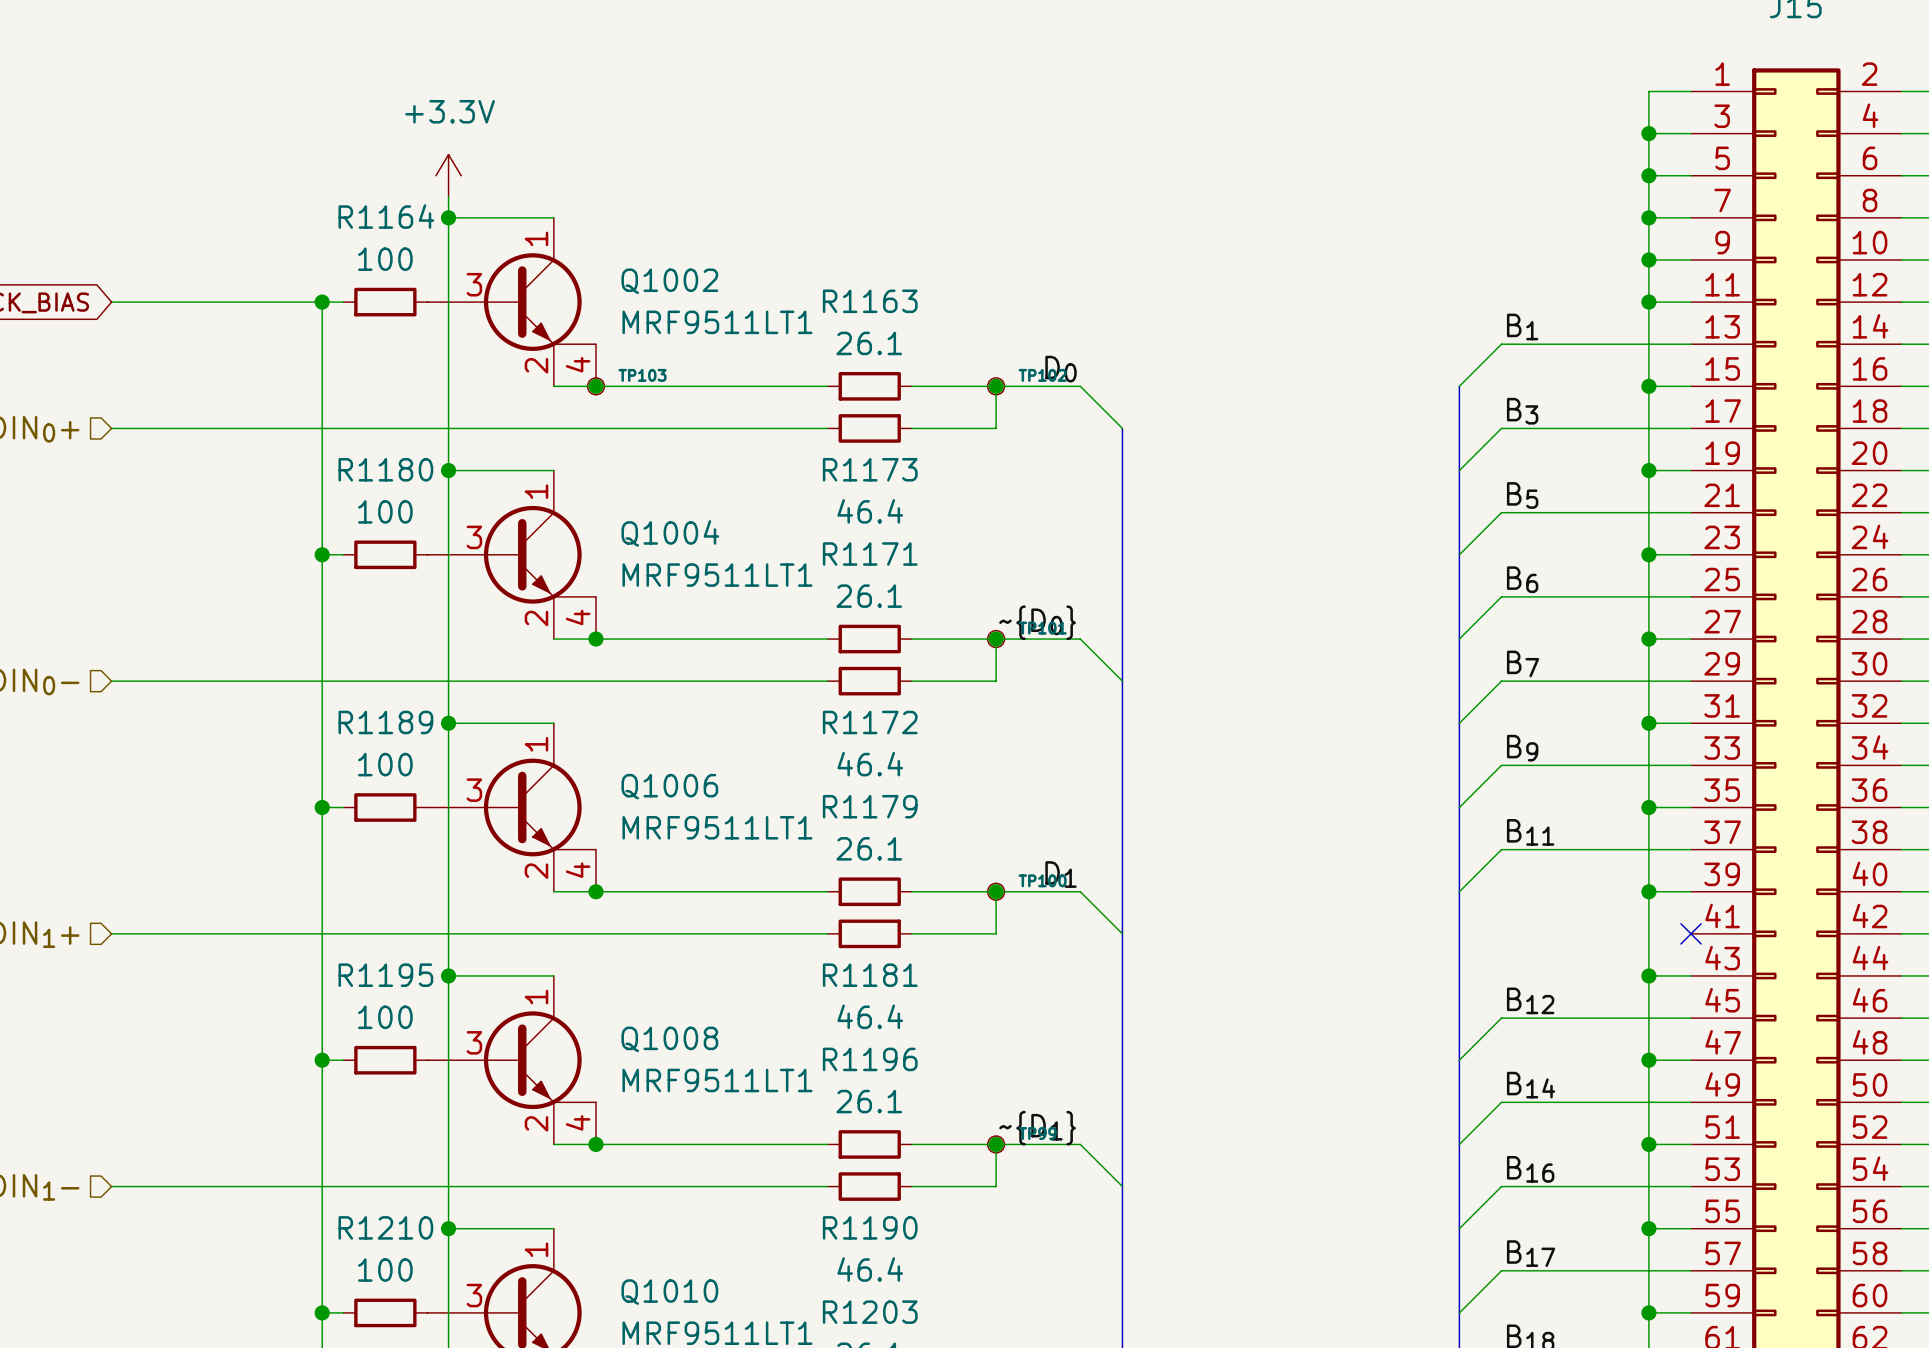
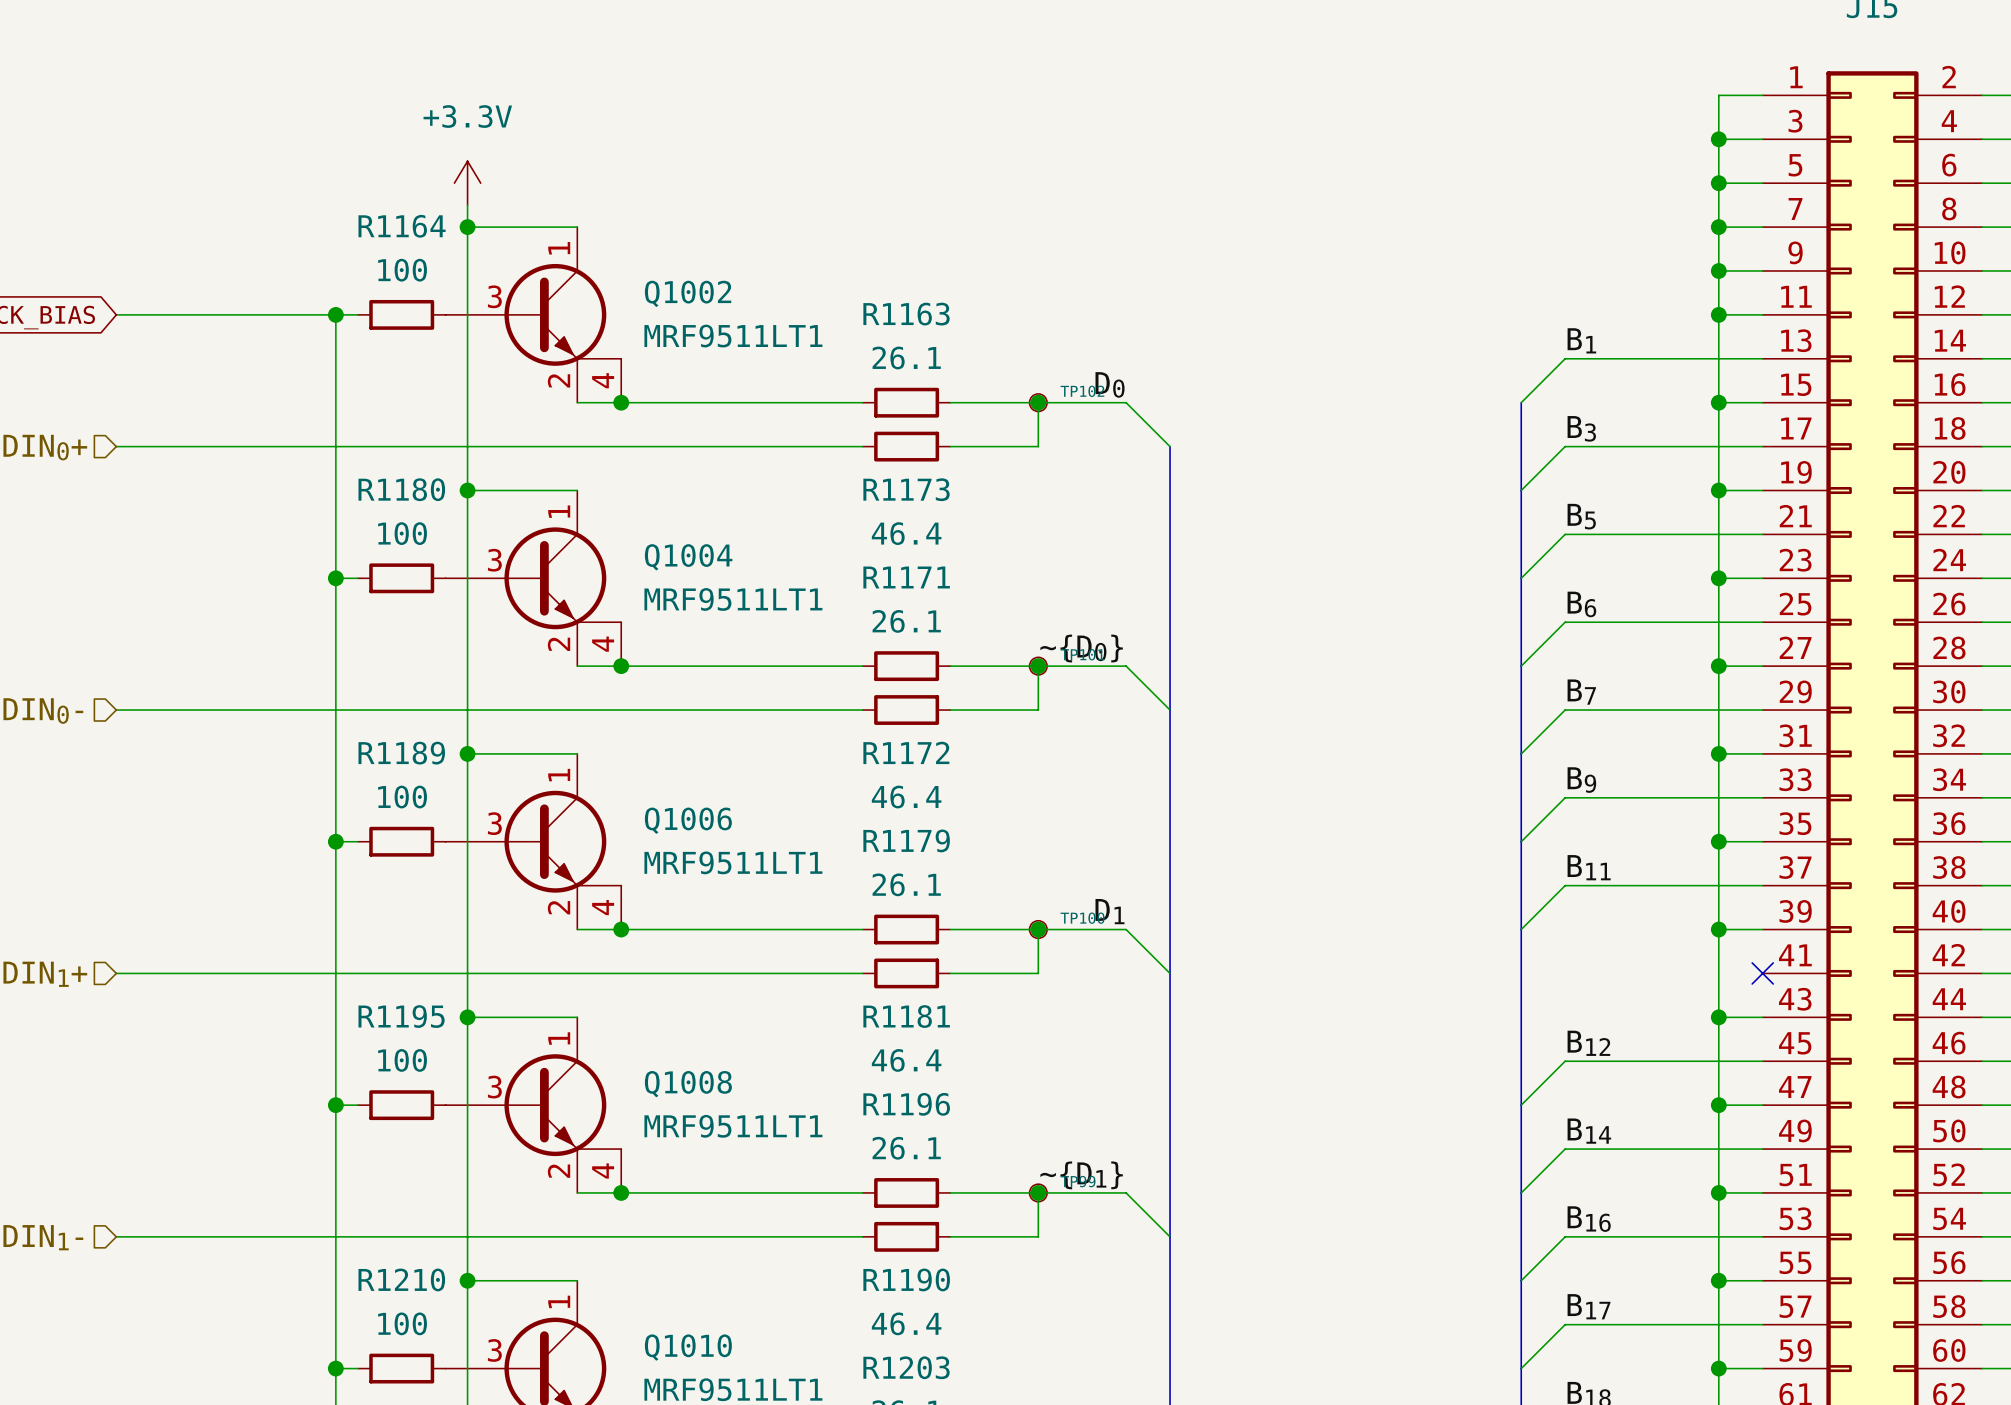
TP103: (595, 386) -> none

